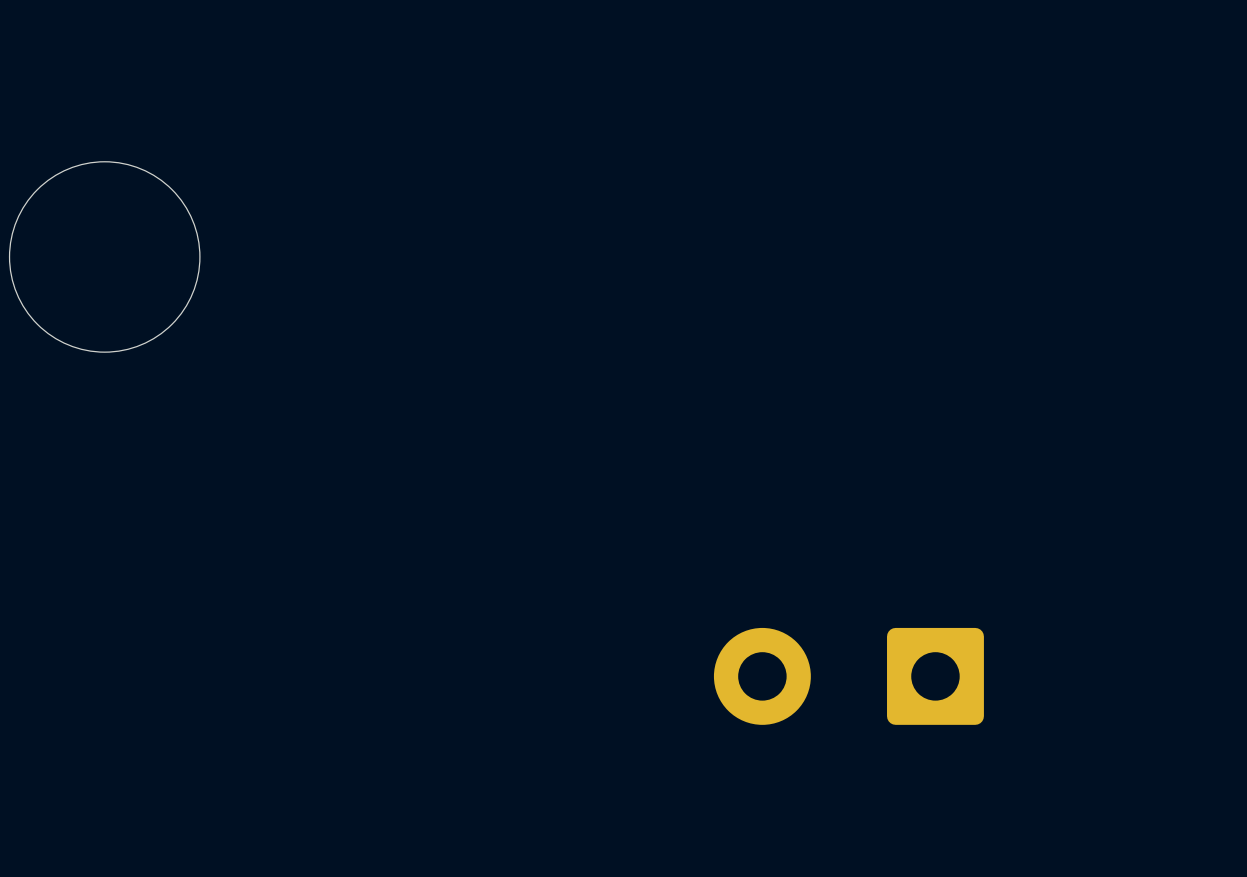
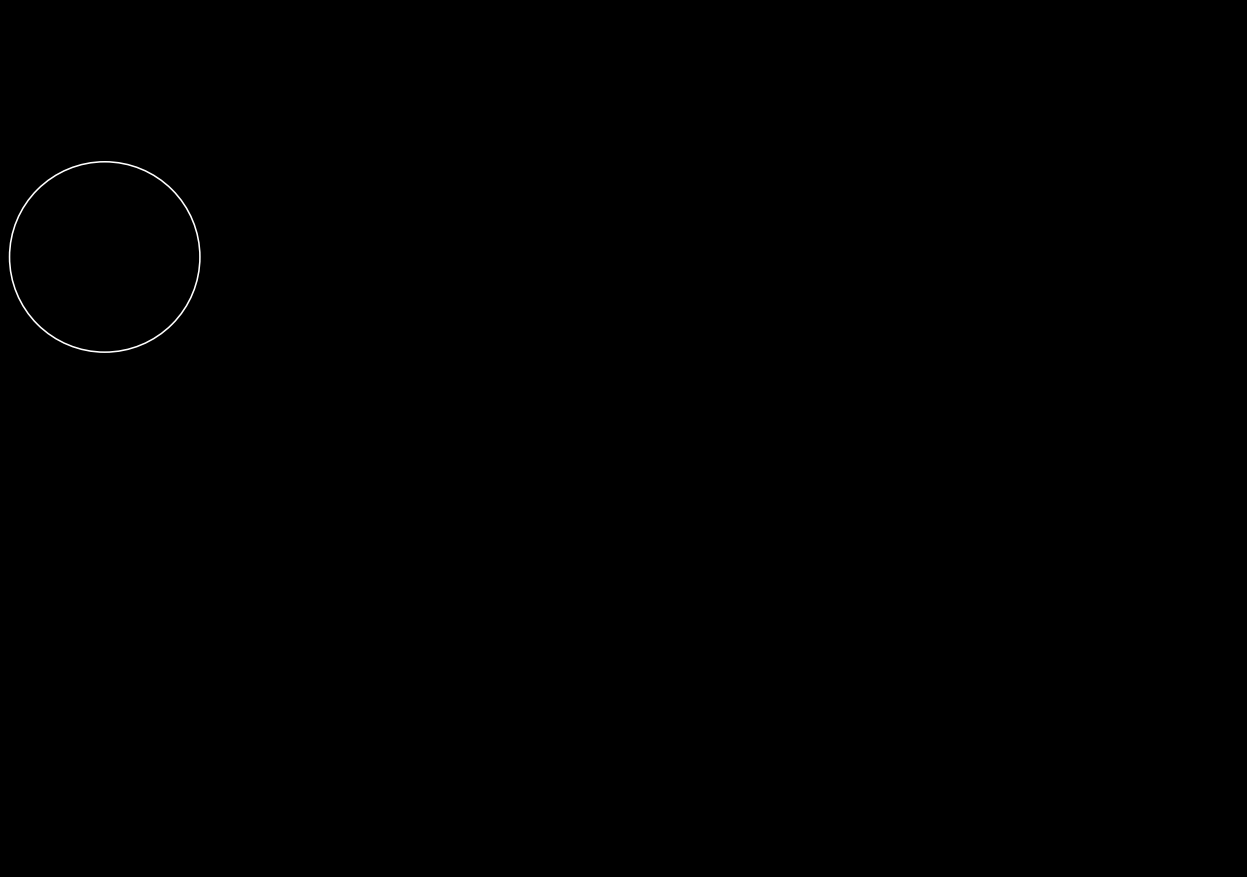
part: (848, 676) -> none

